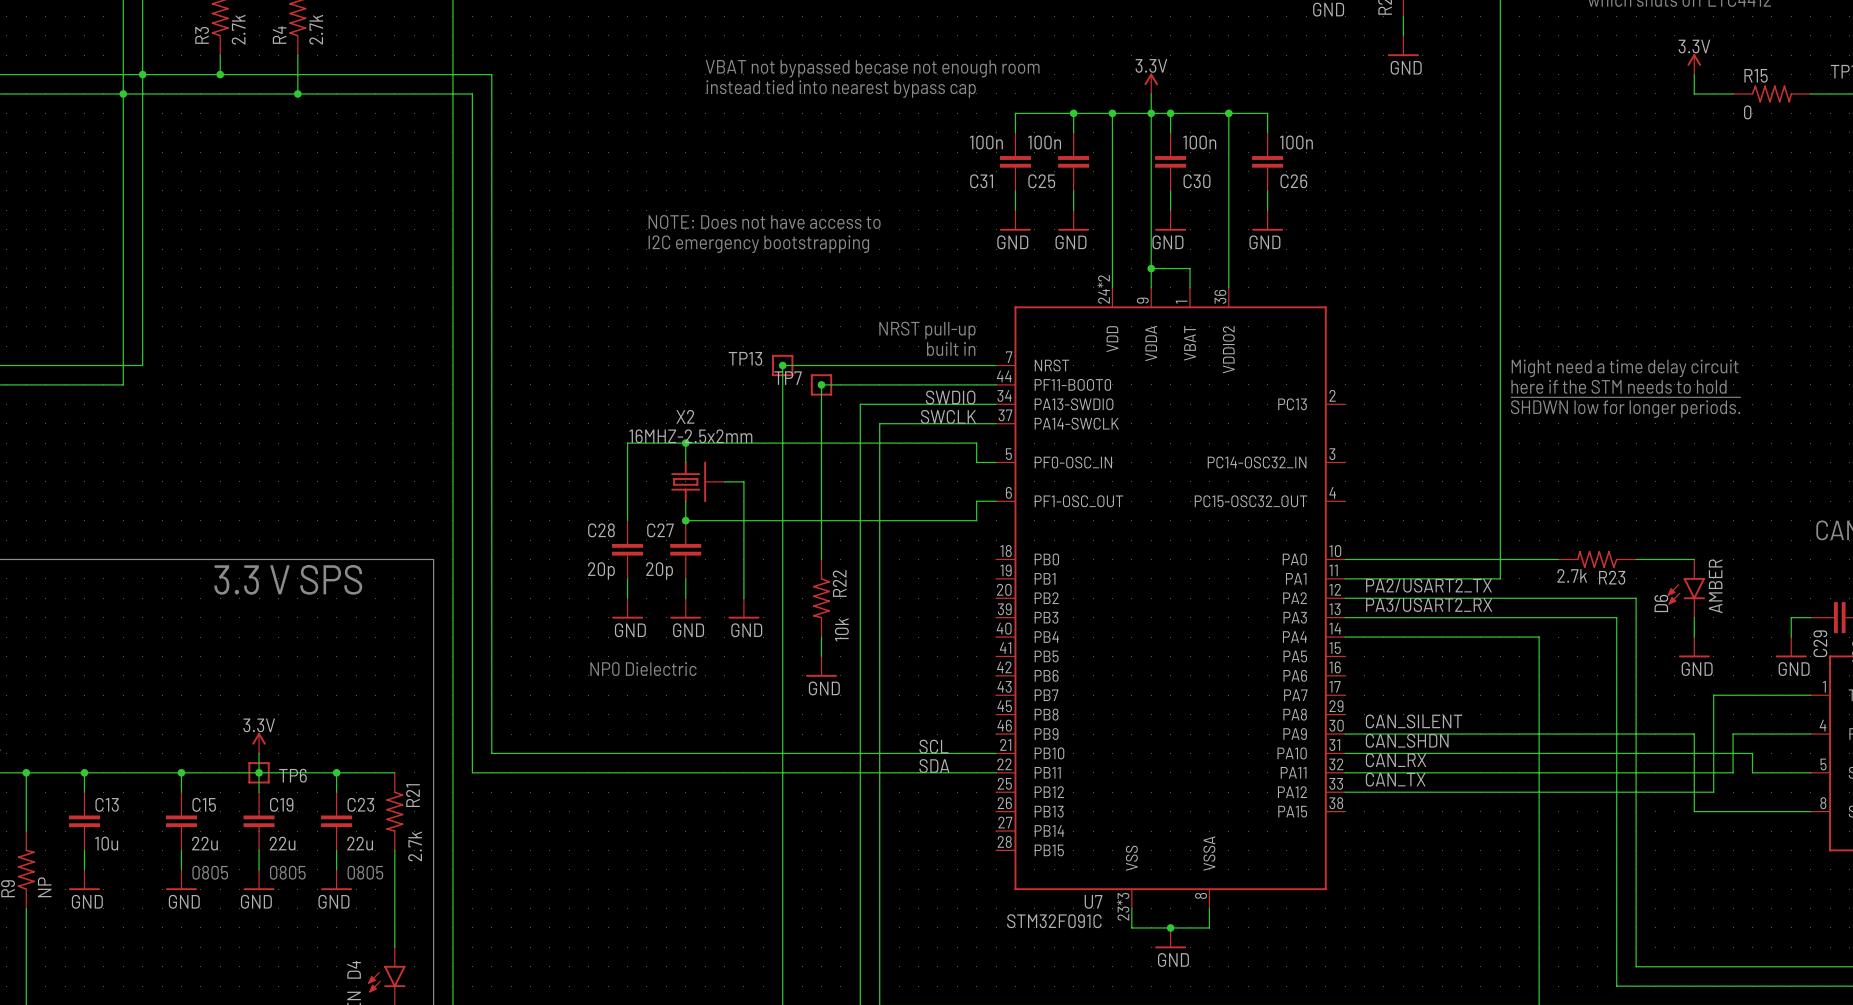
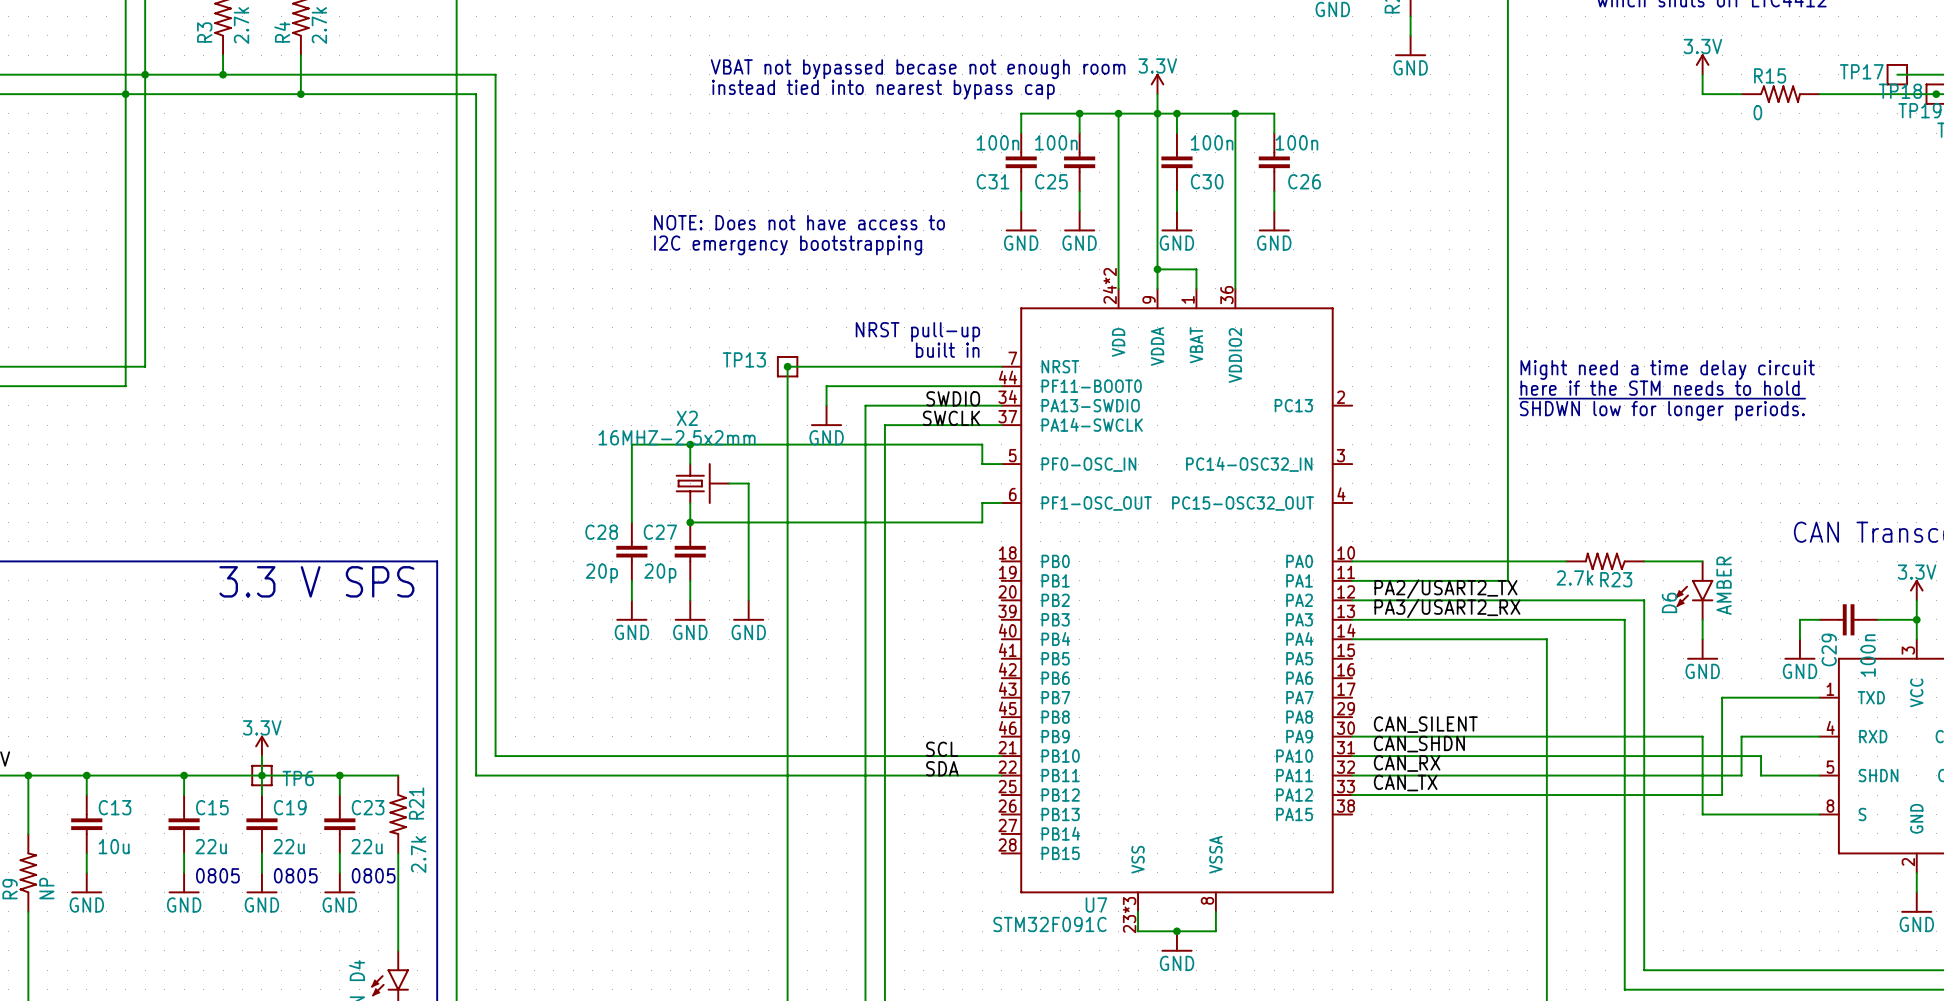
TP7: (821, 384) -> none
junction: (821, 384) -> none
wire: (821, 404) (821, 559) -> none
power symbol: none -> GND (826, 415)
R22: 10k (821, 598) -> none
wire: (821, 637) (821, 656) -> none
power symbol: GND (821, 666) -> none
text: NP0 Dielectric (643, 669) -> none

